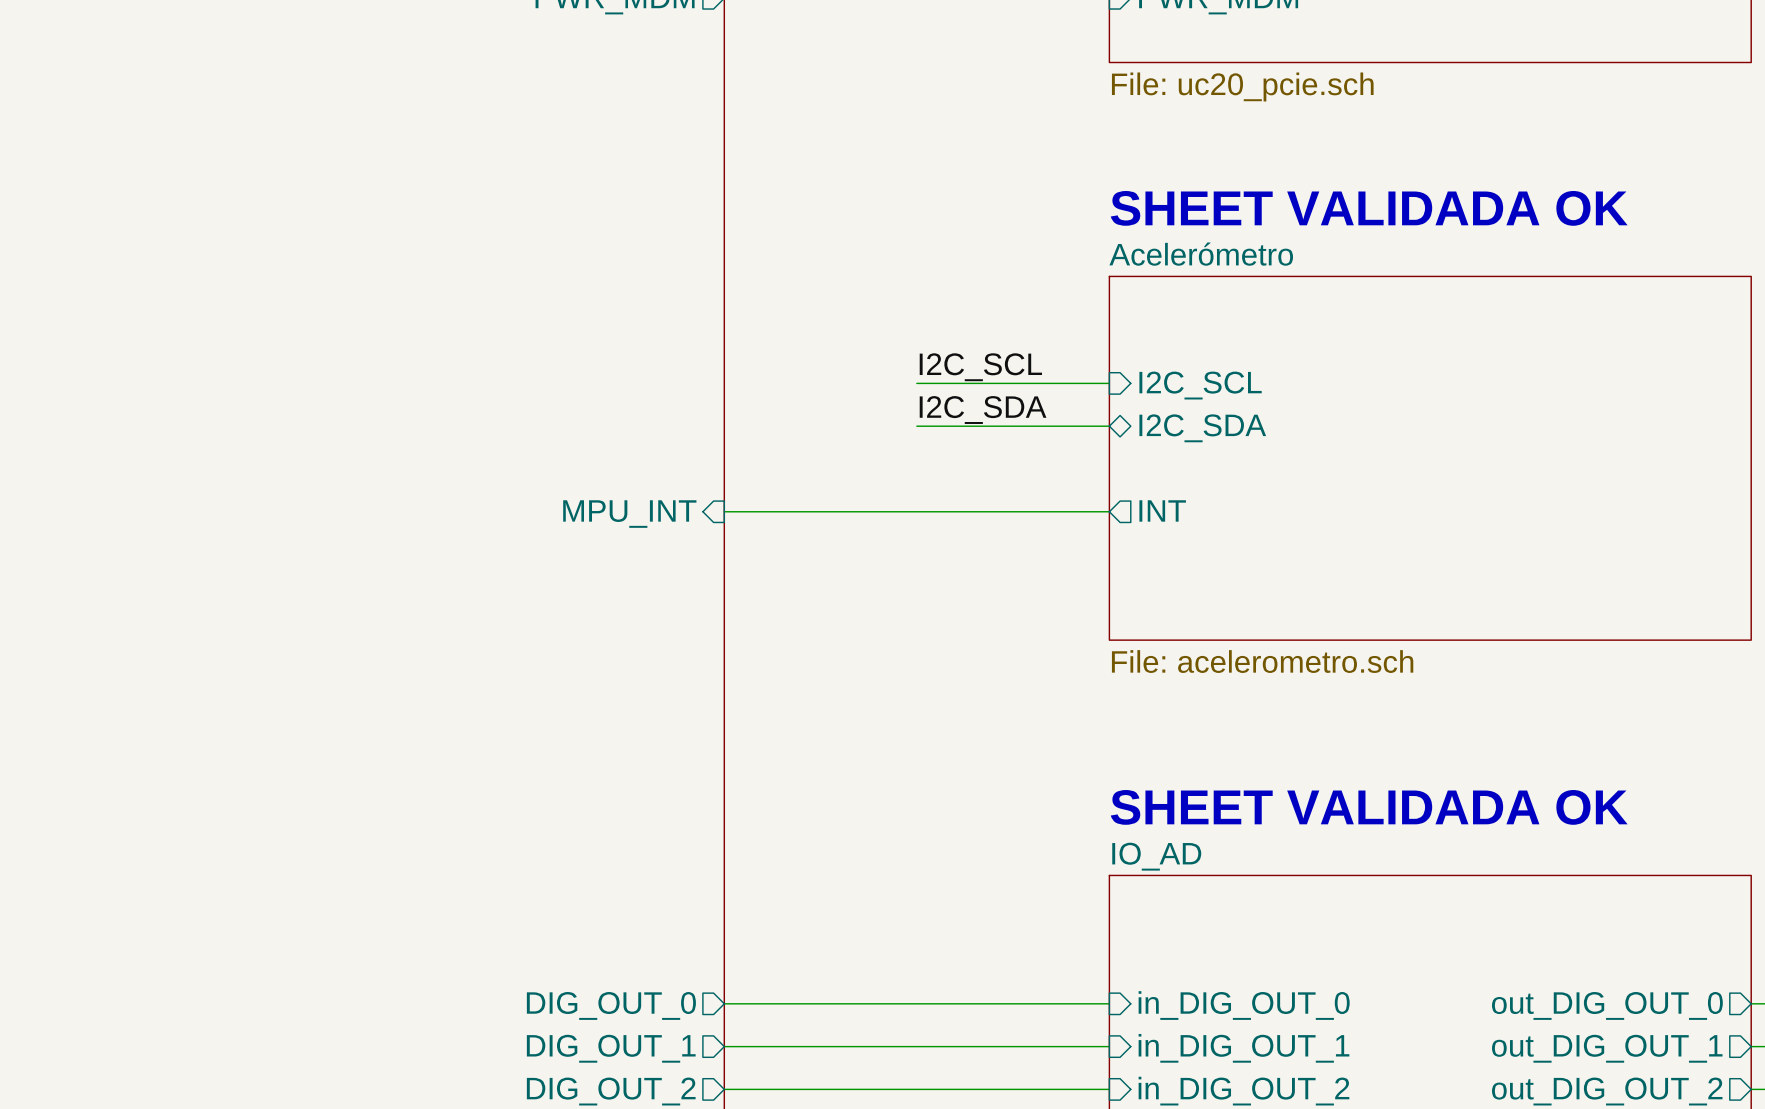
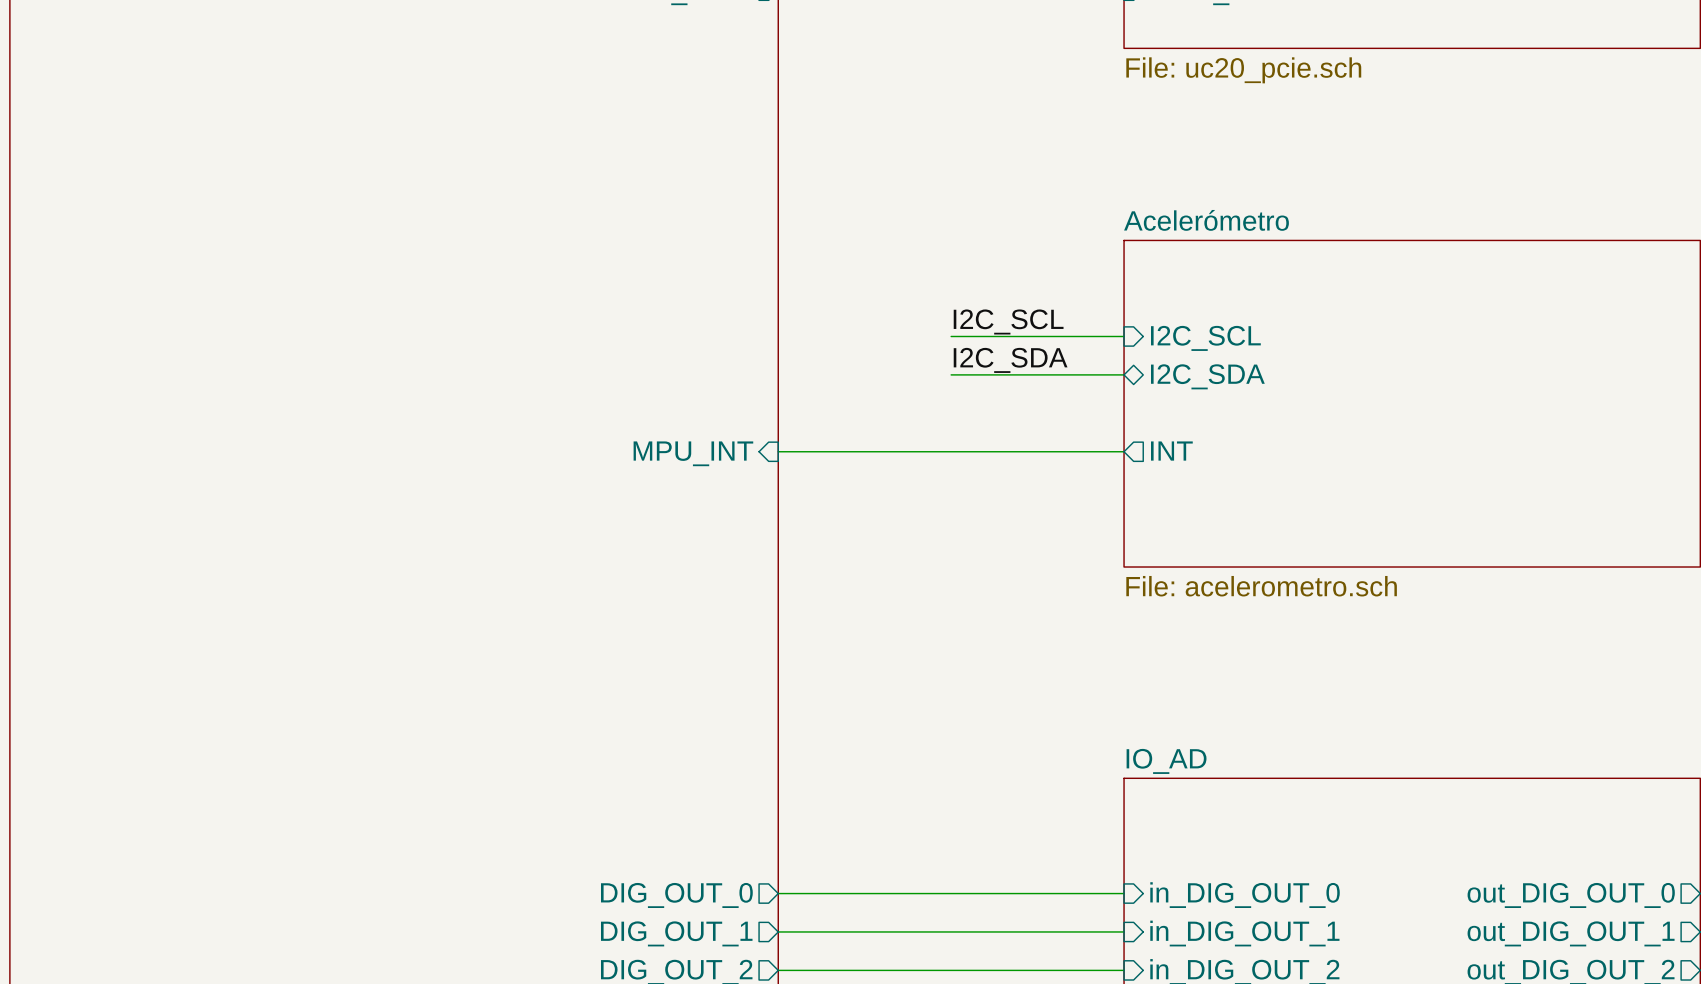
text: SHEET VALIDADA OK (1369, 208) -> none
text: SHEET VALIDADA OK (1369, 807) -> none

